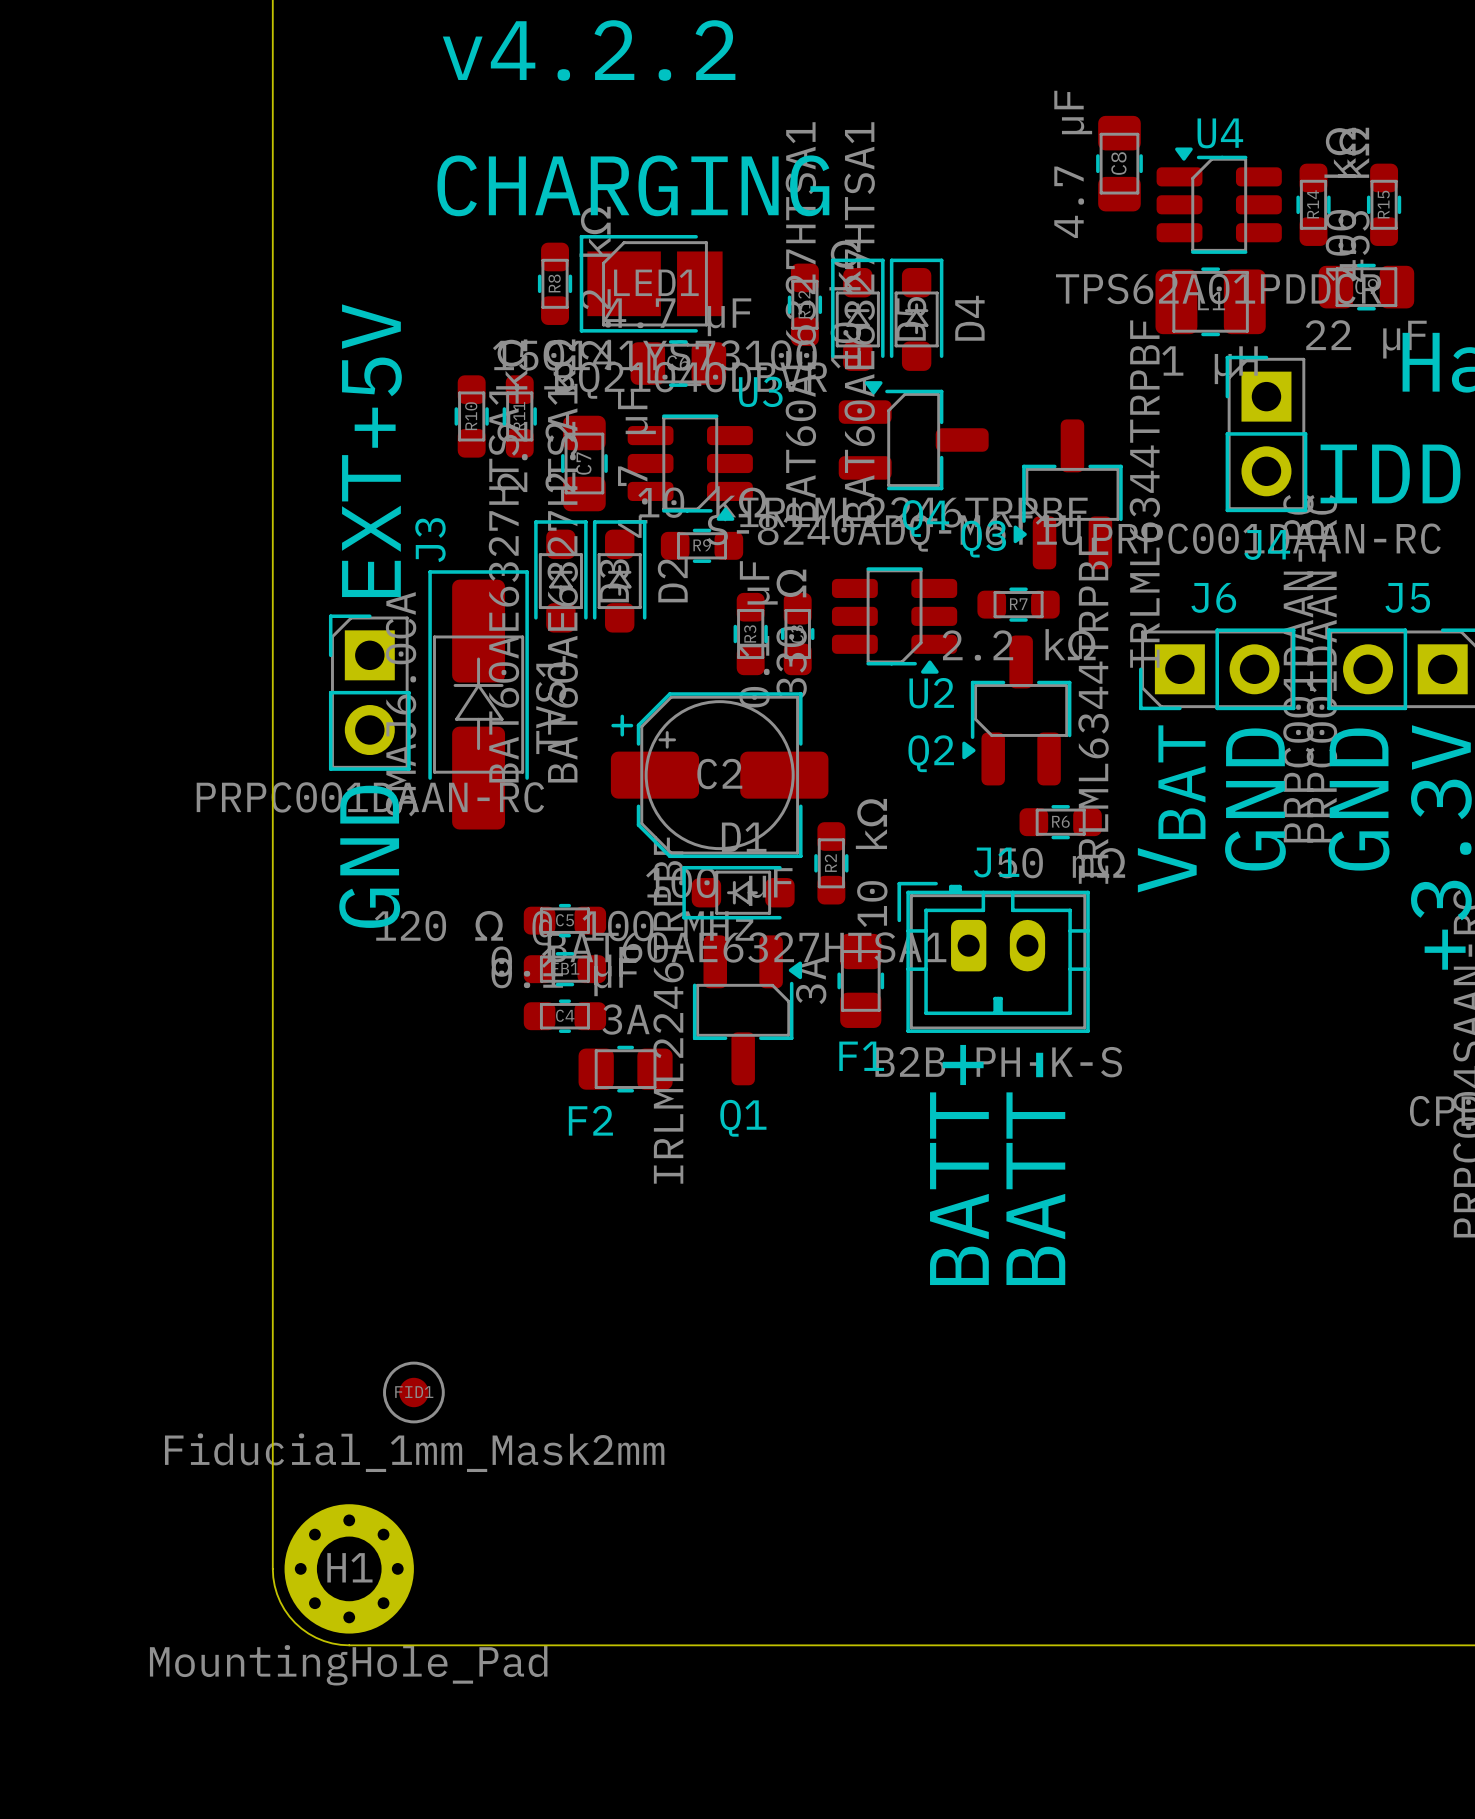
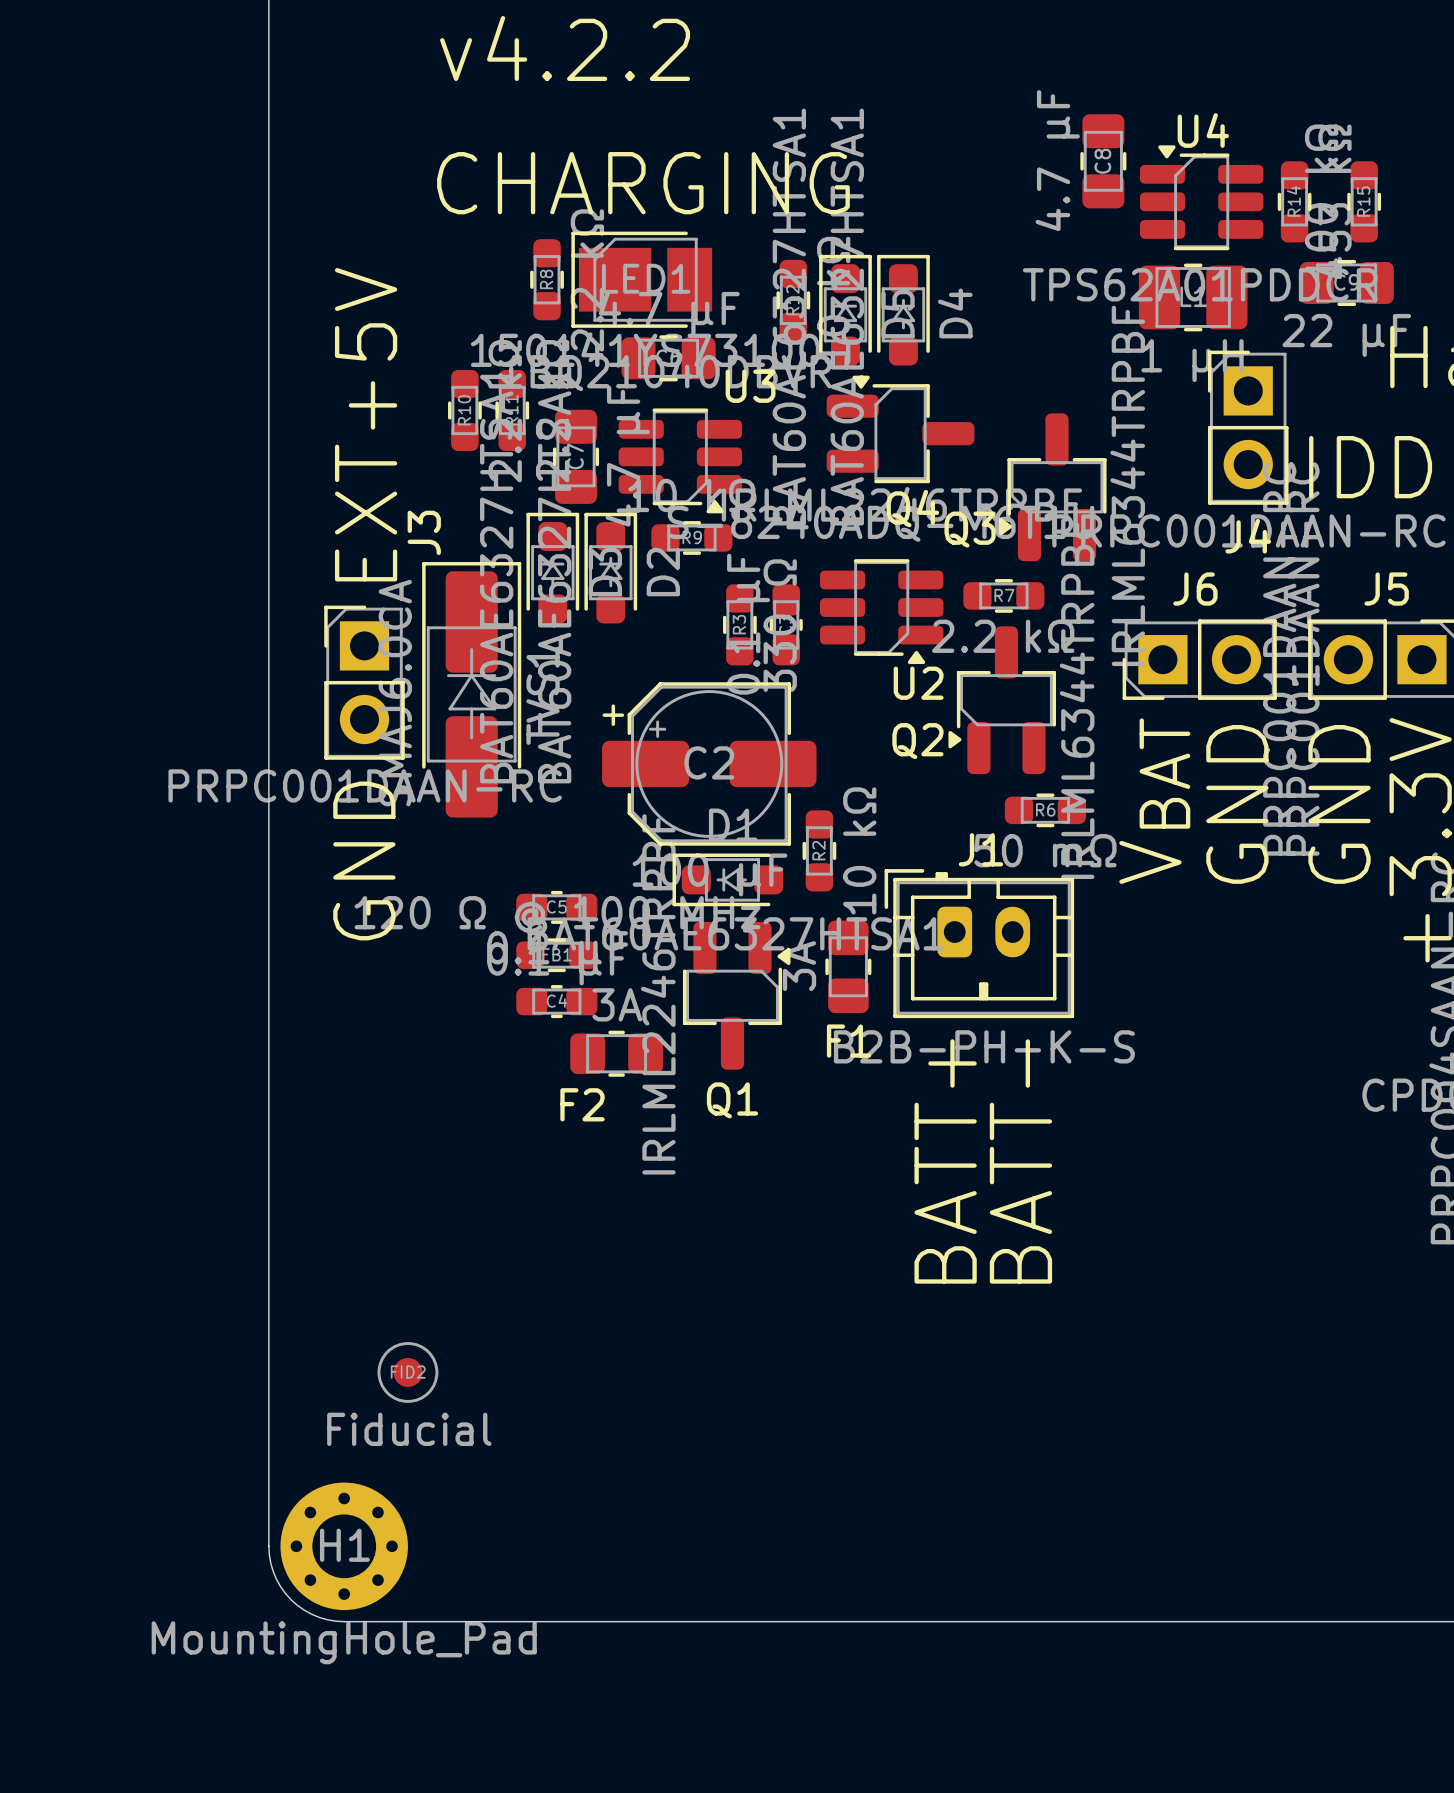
FID1 name: FID1 (414, 1392) -> FID2 (408, 1372)
FID1 value: Fiducial_1mm_Mask2mm (414, 1452) -> Fiducial (409, 1429)

